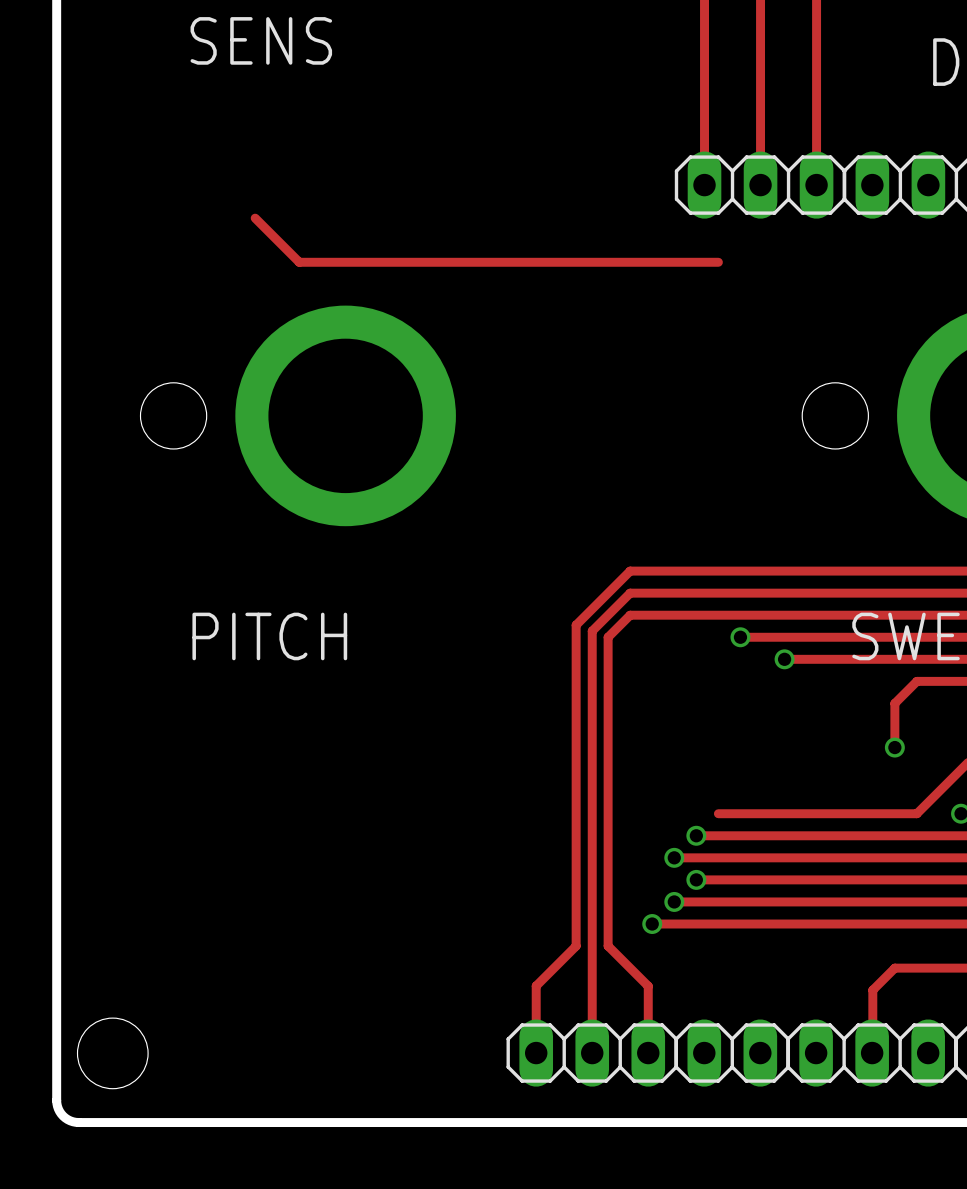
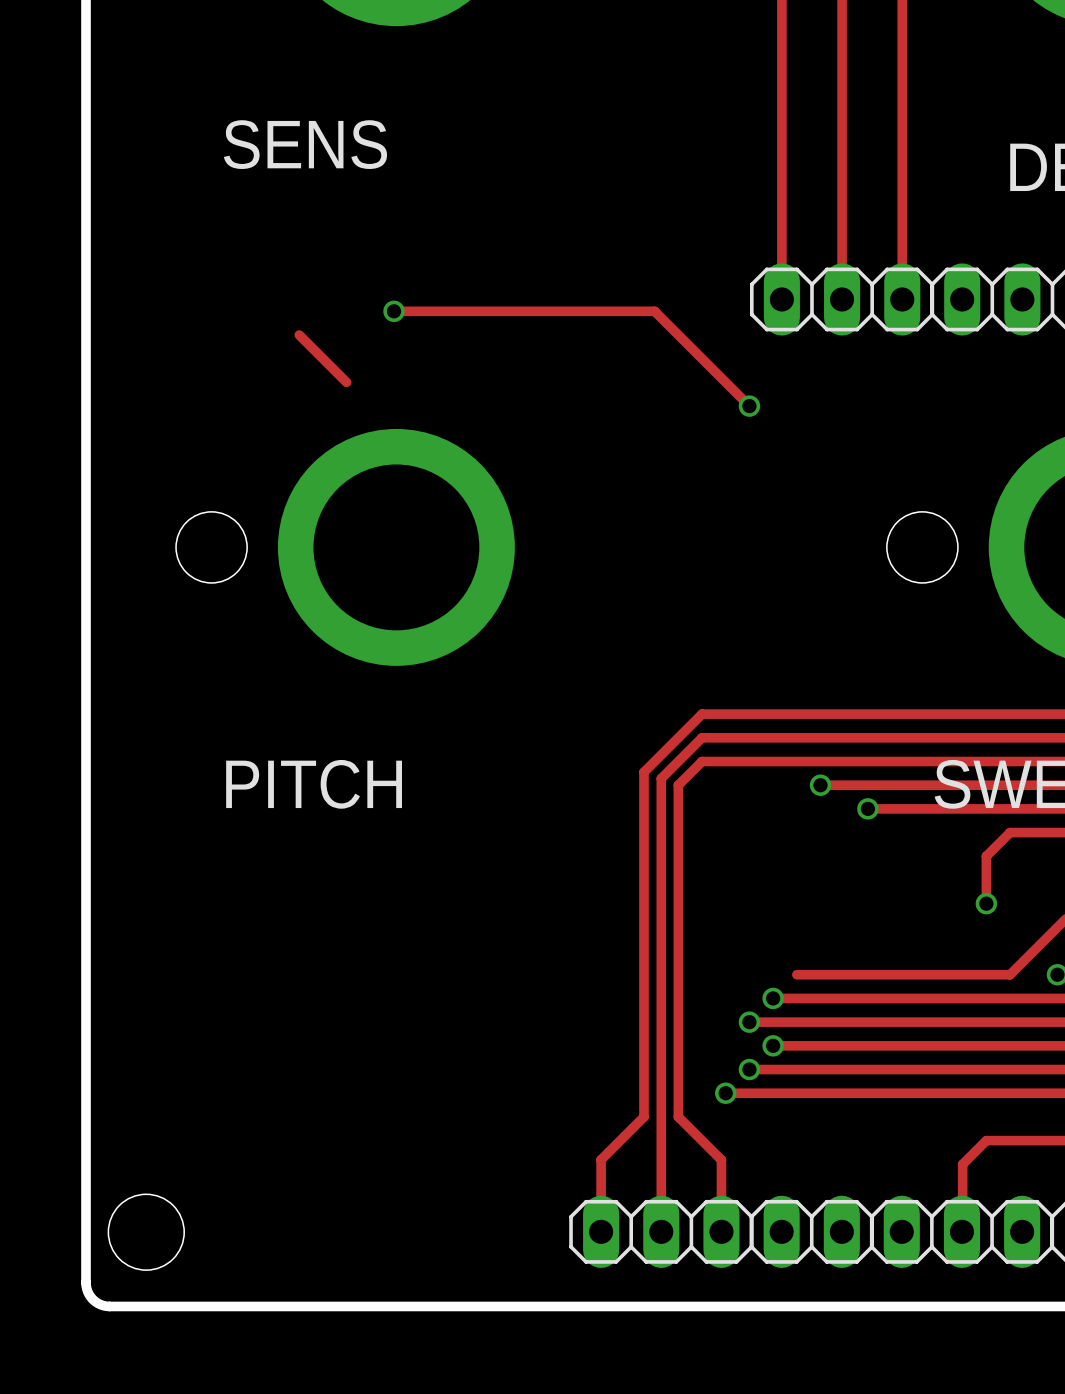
track: none -> (394, 311) (654, 311) (749, 406)
via: none -> (394, 311)
track: (299, 262) (718, 262) -> none
via: none -> (749, 406)

